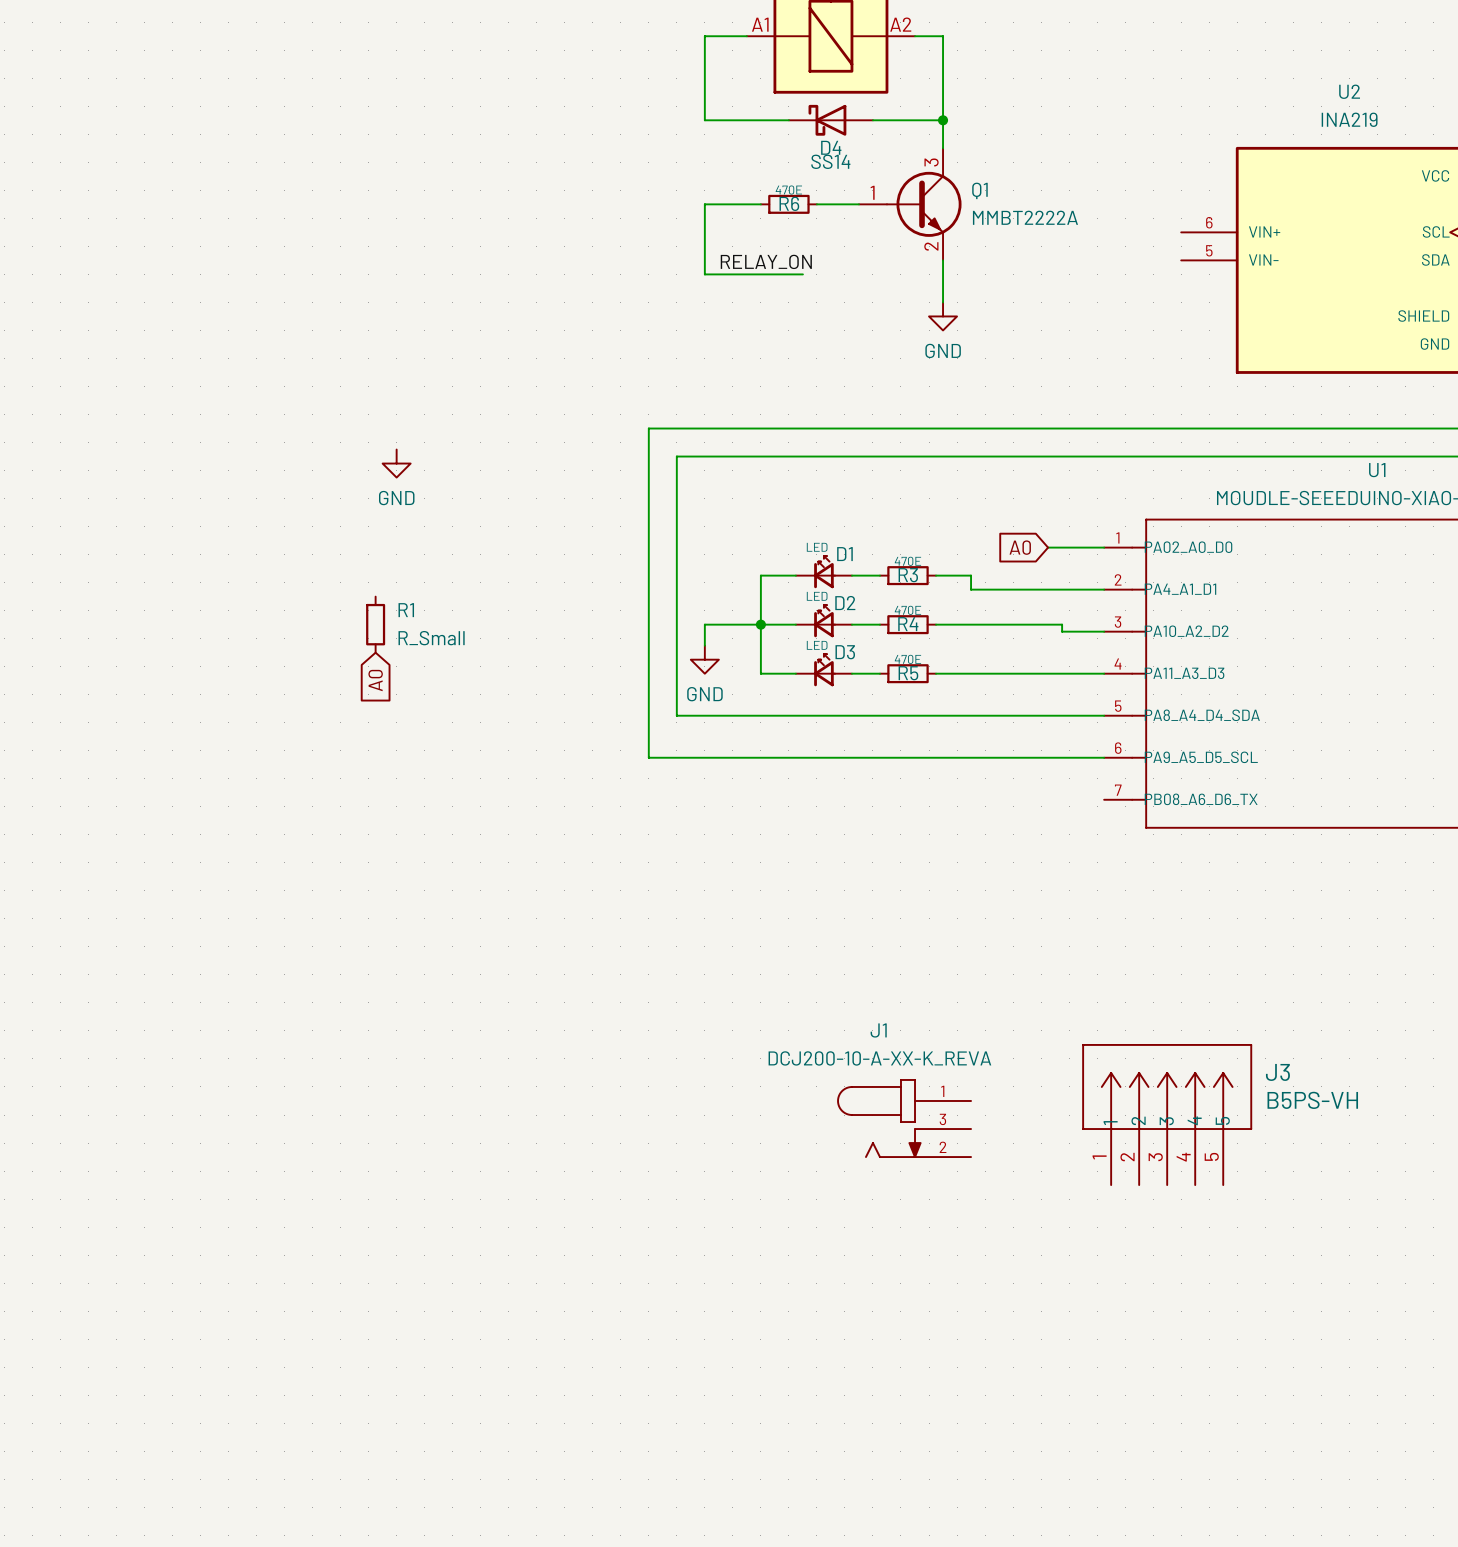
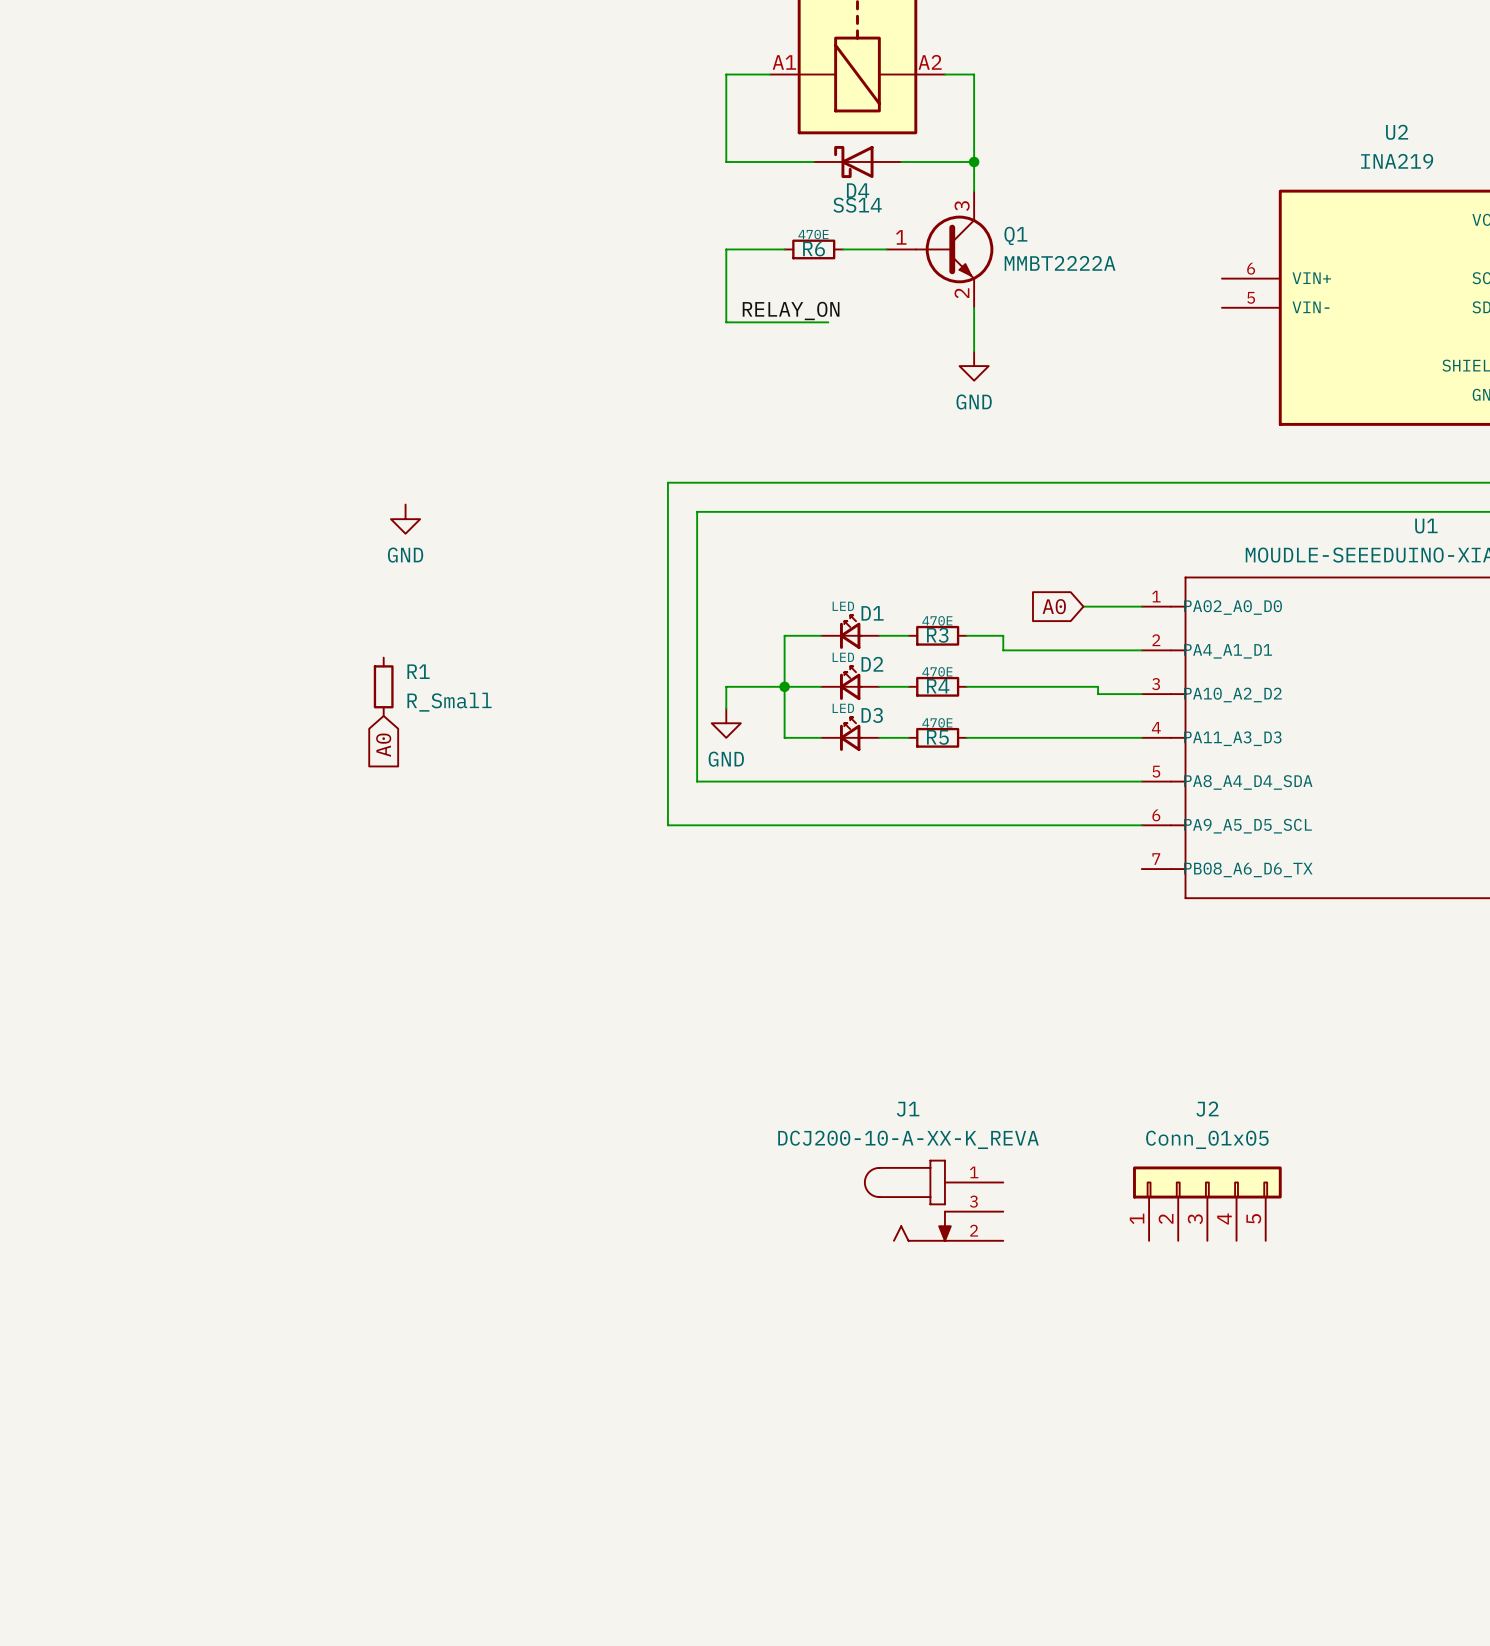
J3: B5PS-VH (1167, 1114) -> none
J2: none -> Conn_01x05 (1207, 1203)

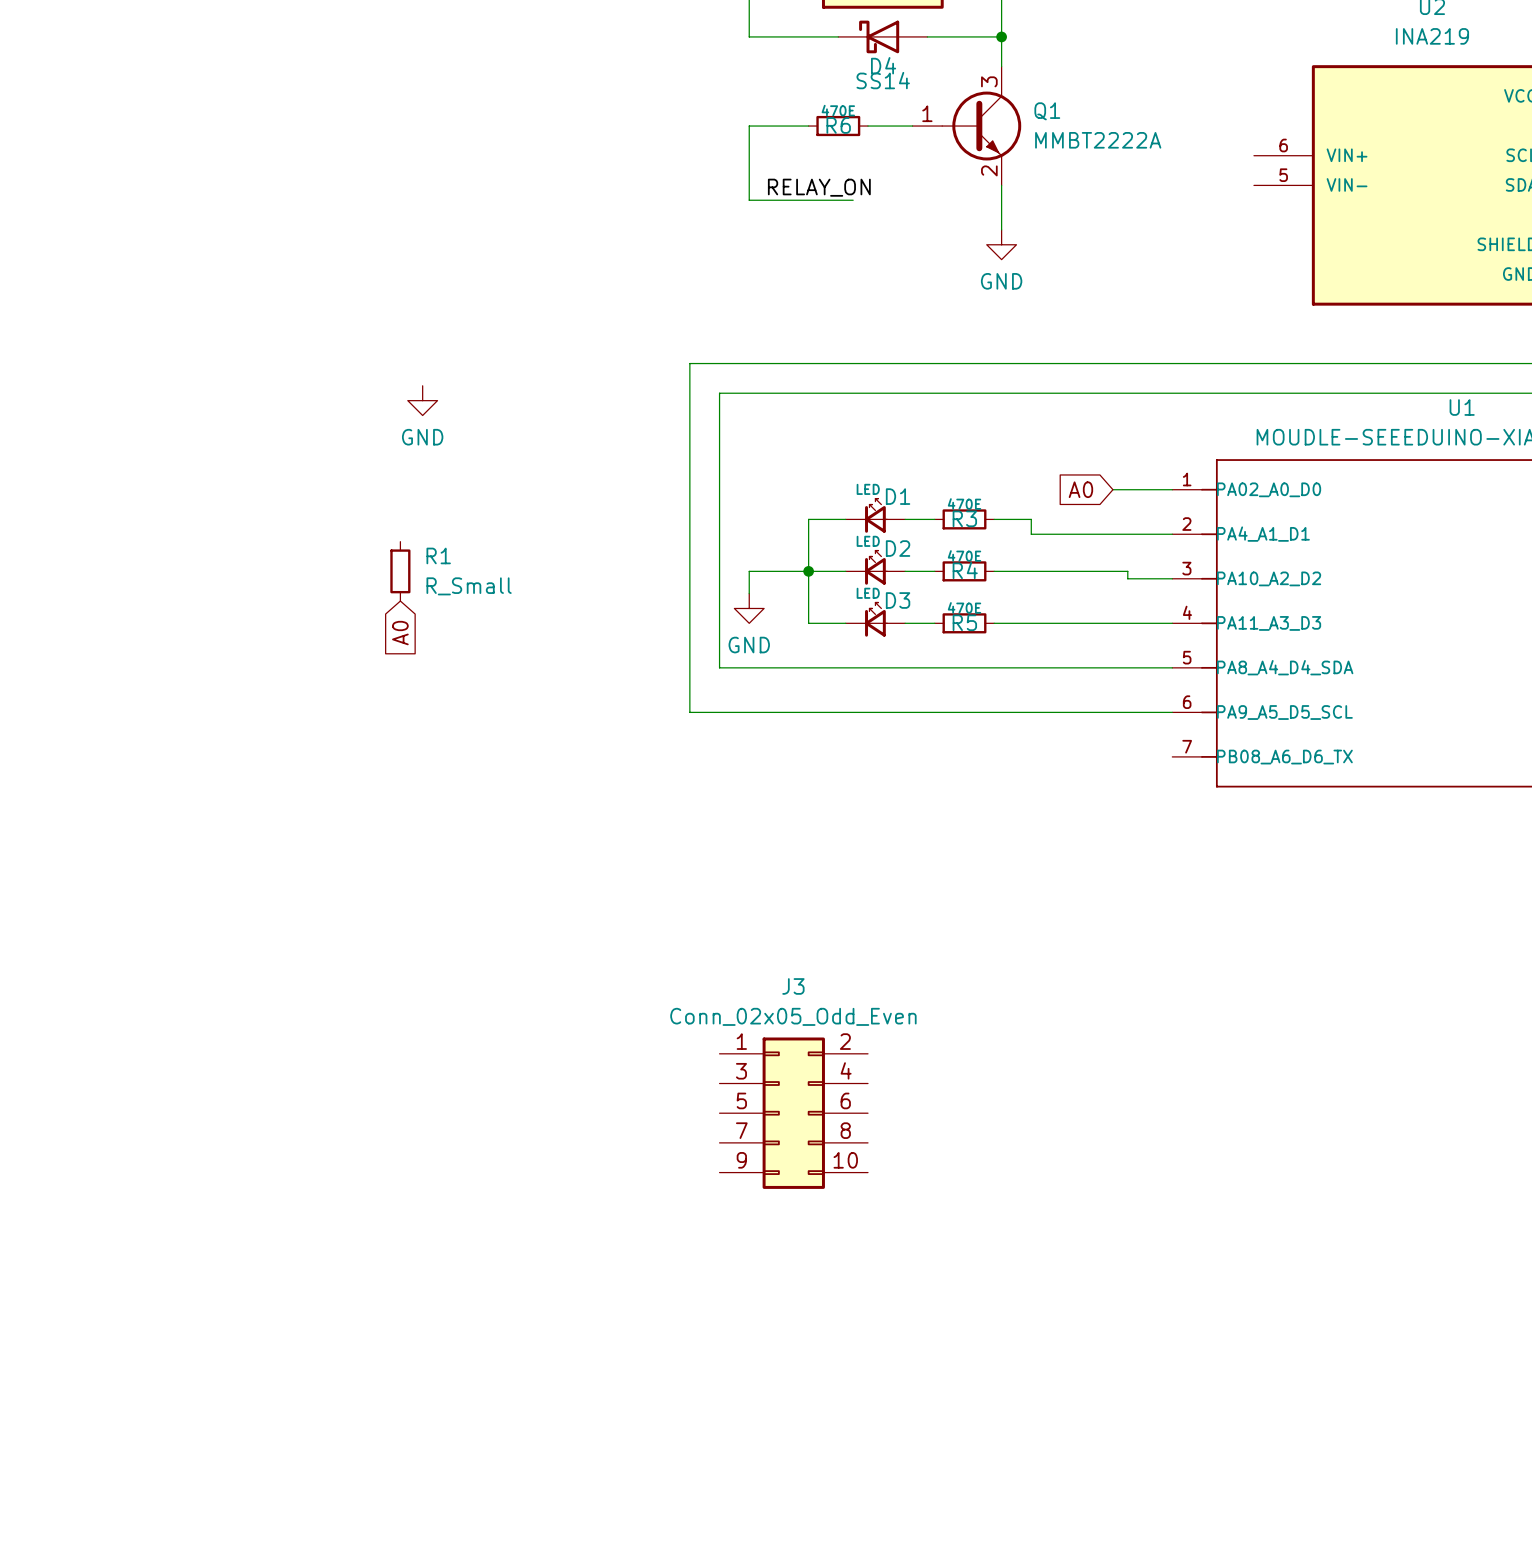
J1: DCJ200-10-A-XX-K_REVA (933, 1200) -> none
J2: Conn_01x05 (1207, 1203) -> none
J3: none -> Conn_02x05_Odd_Even (793, 1113)

